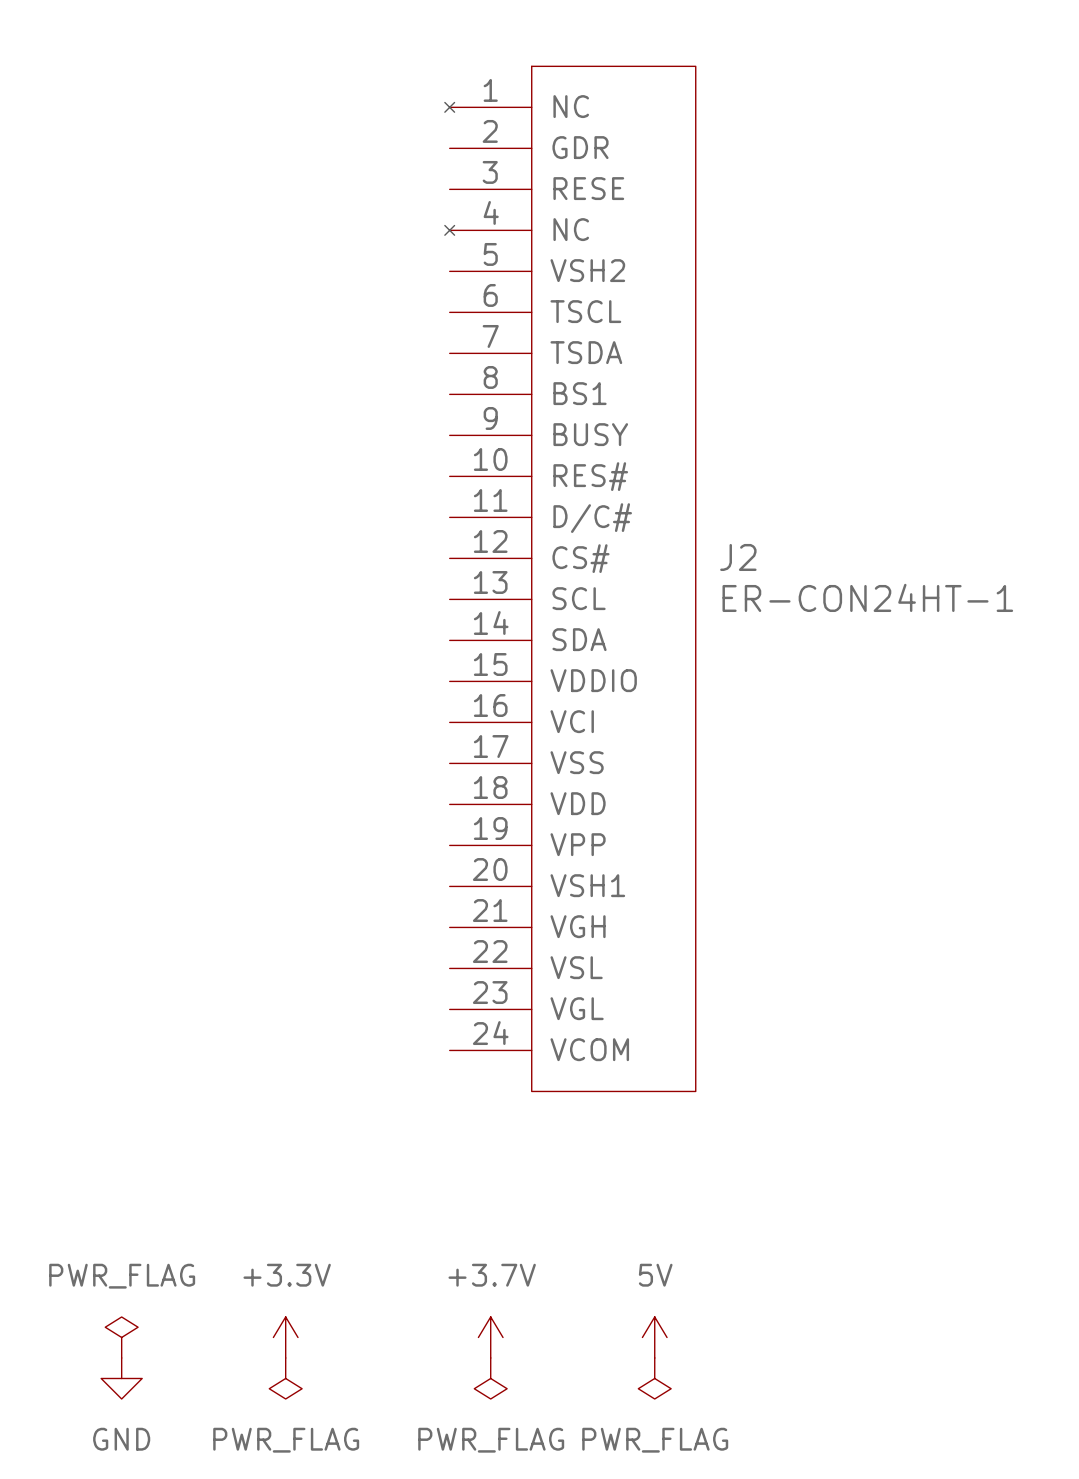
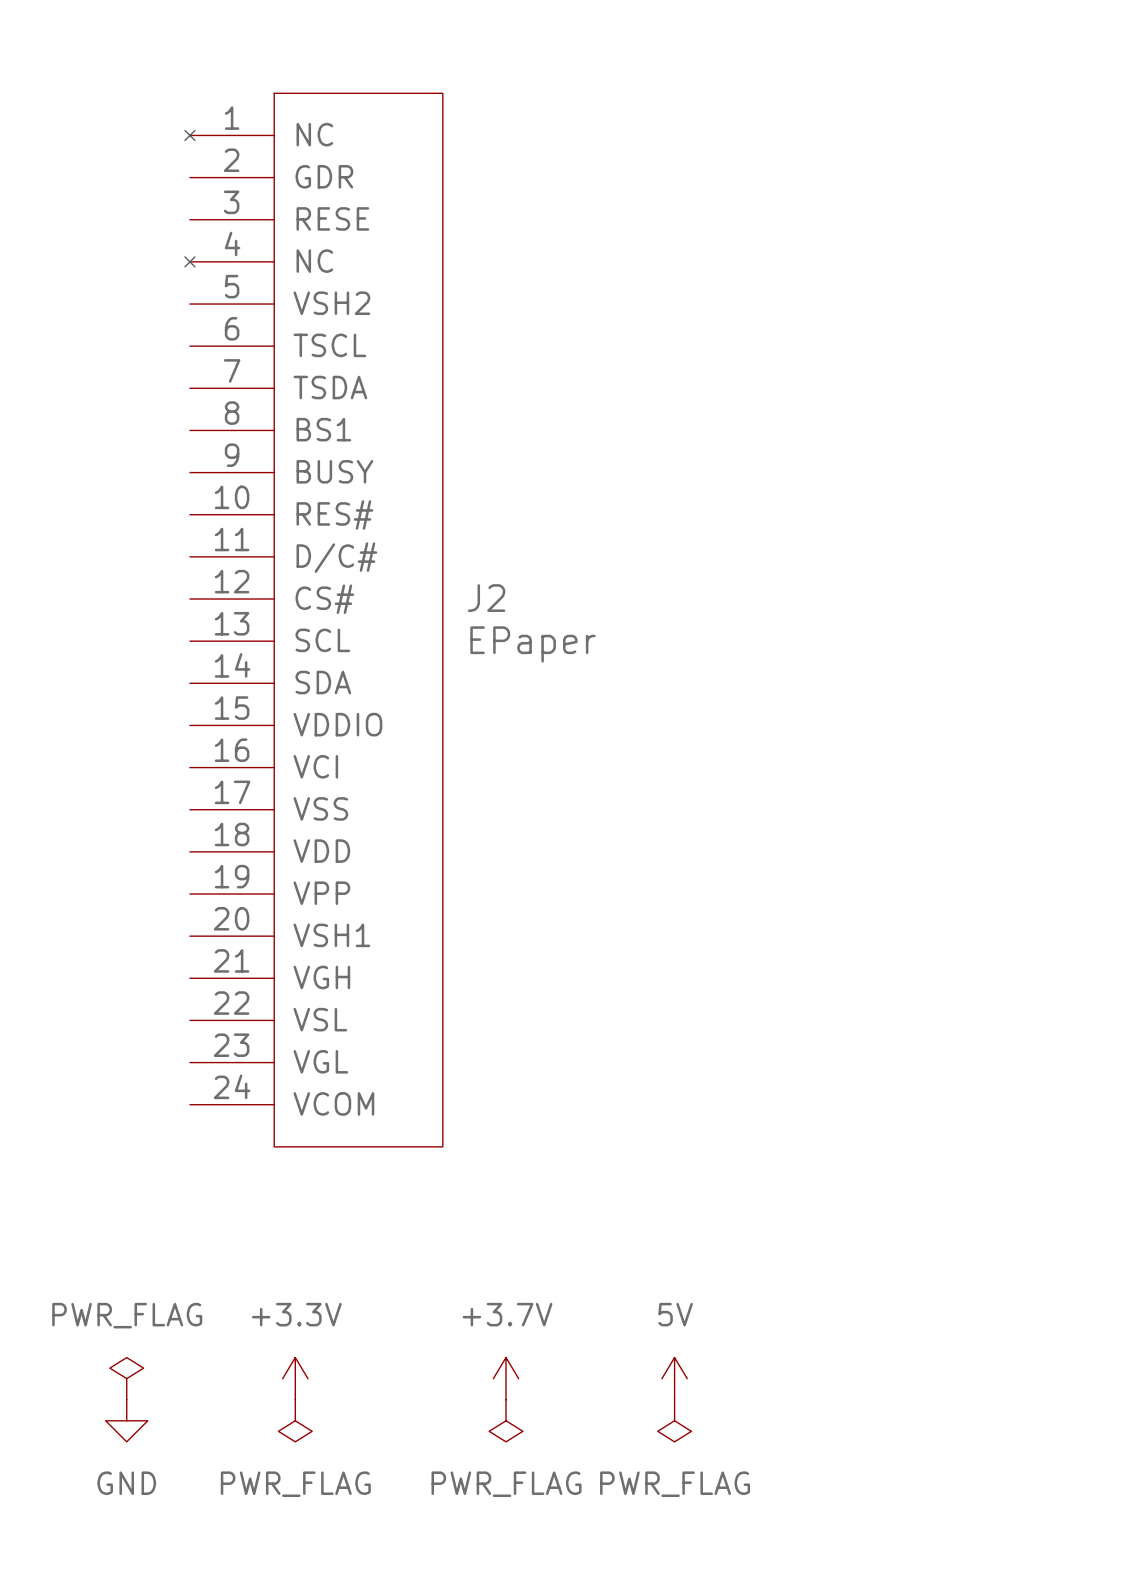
J2 position: (570, 578) -> (313, 620)
J2 value: ER-CON24HT-1 (867, 597) -> EPaper (532, 644)

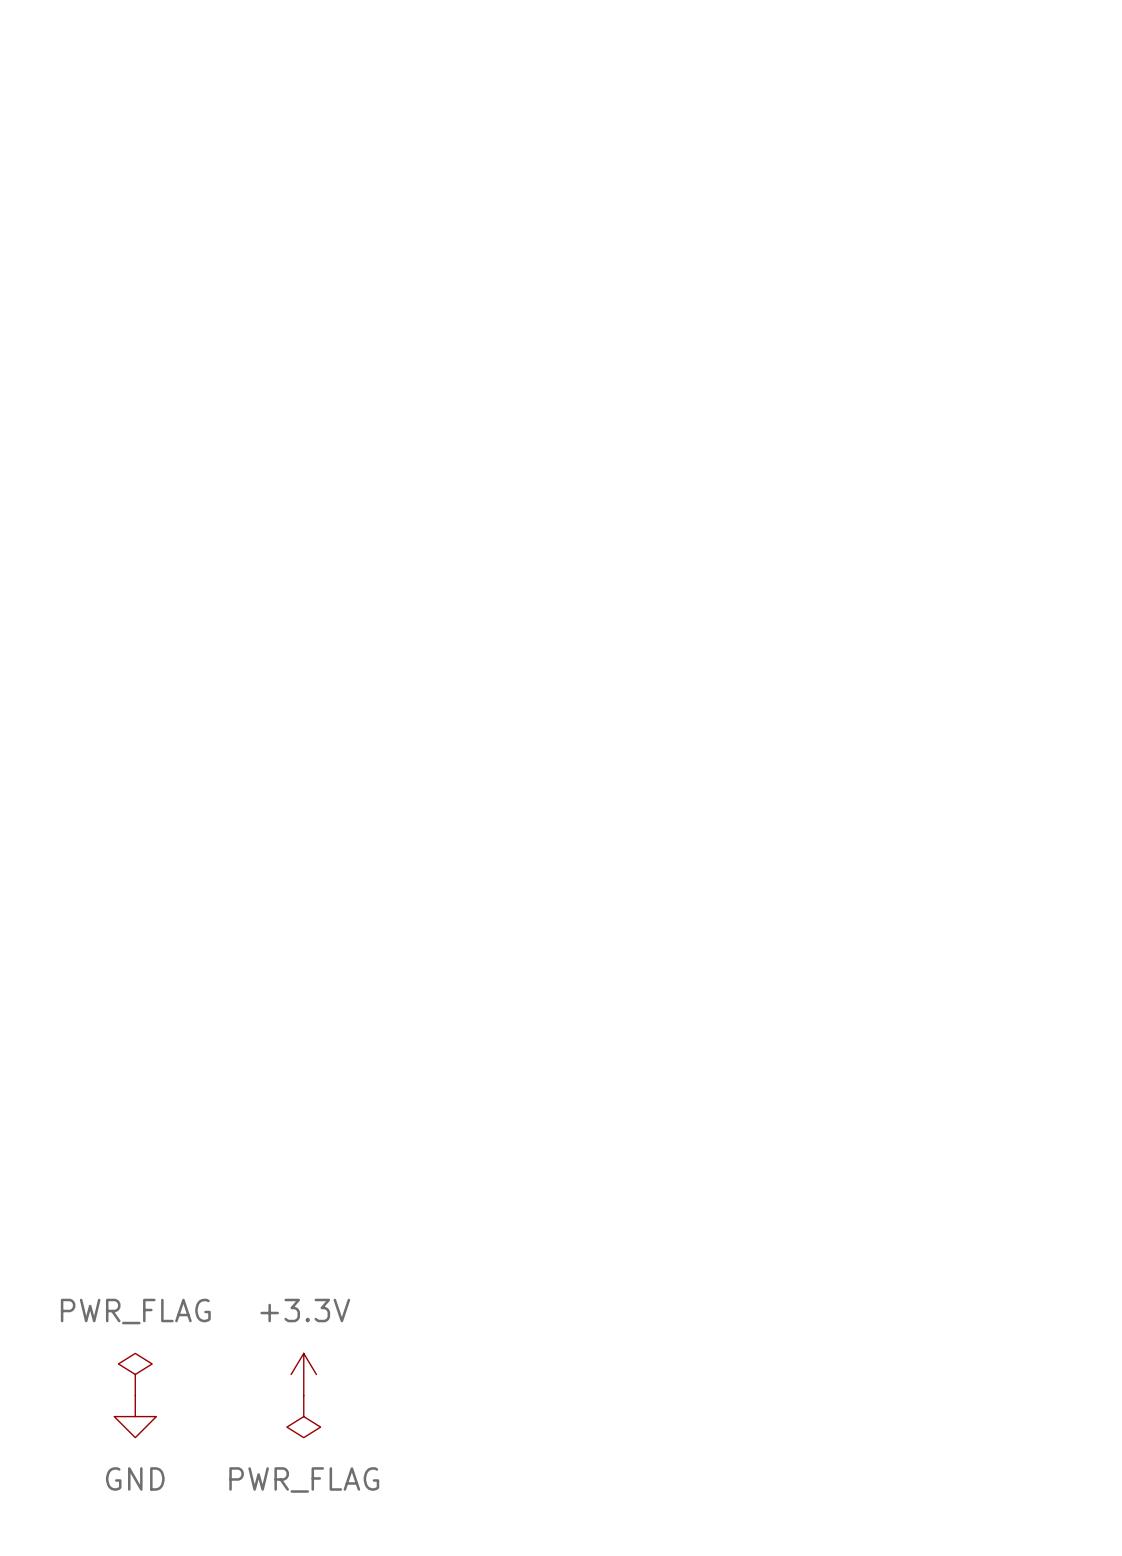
J2: EPaper (313, 620) -> none
power symbol: +3.7V (506, 1378) -> none
power symbol: 5V (674, 1378) -> none
power symbol: PWR_FLAG (506, 1420) -> none
power symbol: PWR_FLAG (674, 1420) -> none

